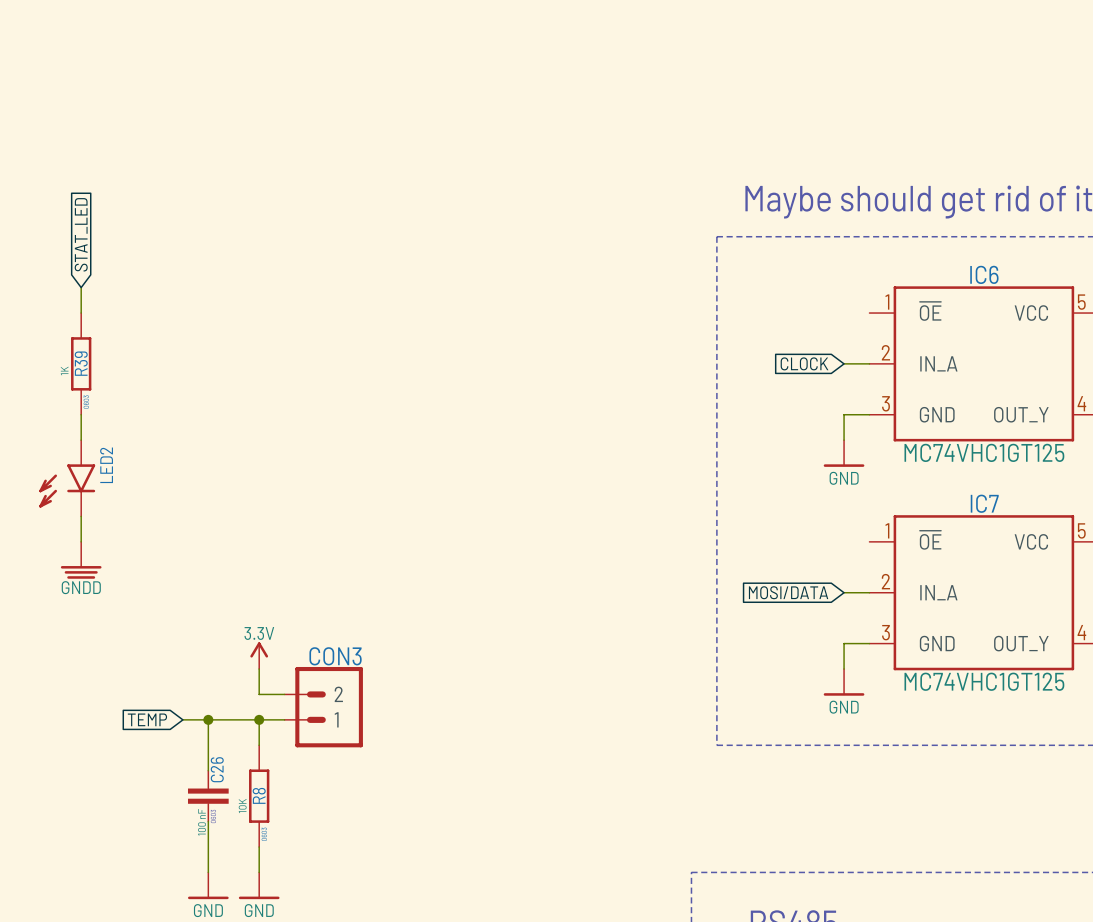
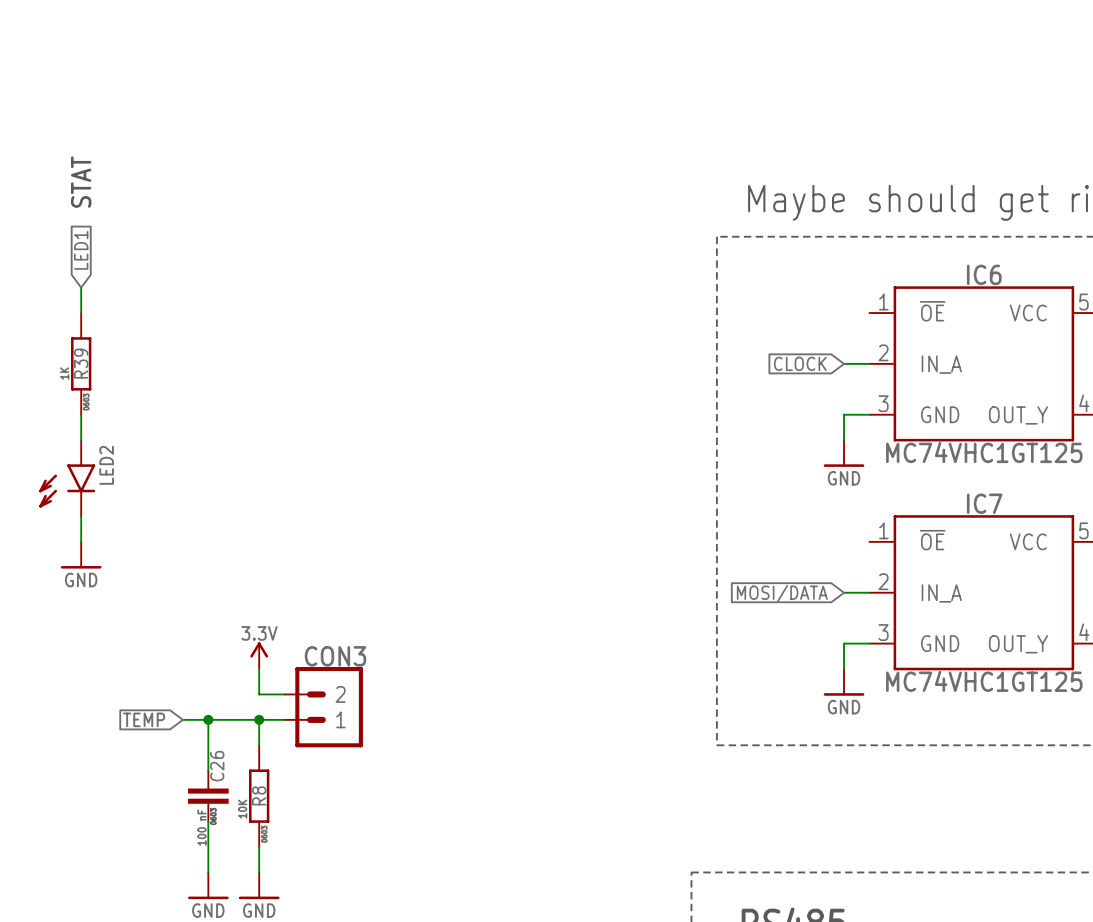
text: none -> STAT (81, 182)
global label: STAT_LED (81, 234) -> LED1 (81, 250)
power symbol: GNDD (81, 560) -> GND (81, 555)

